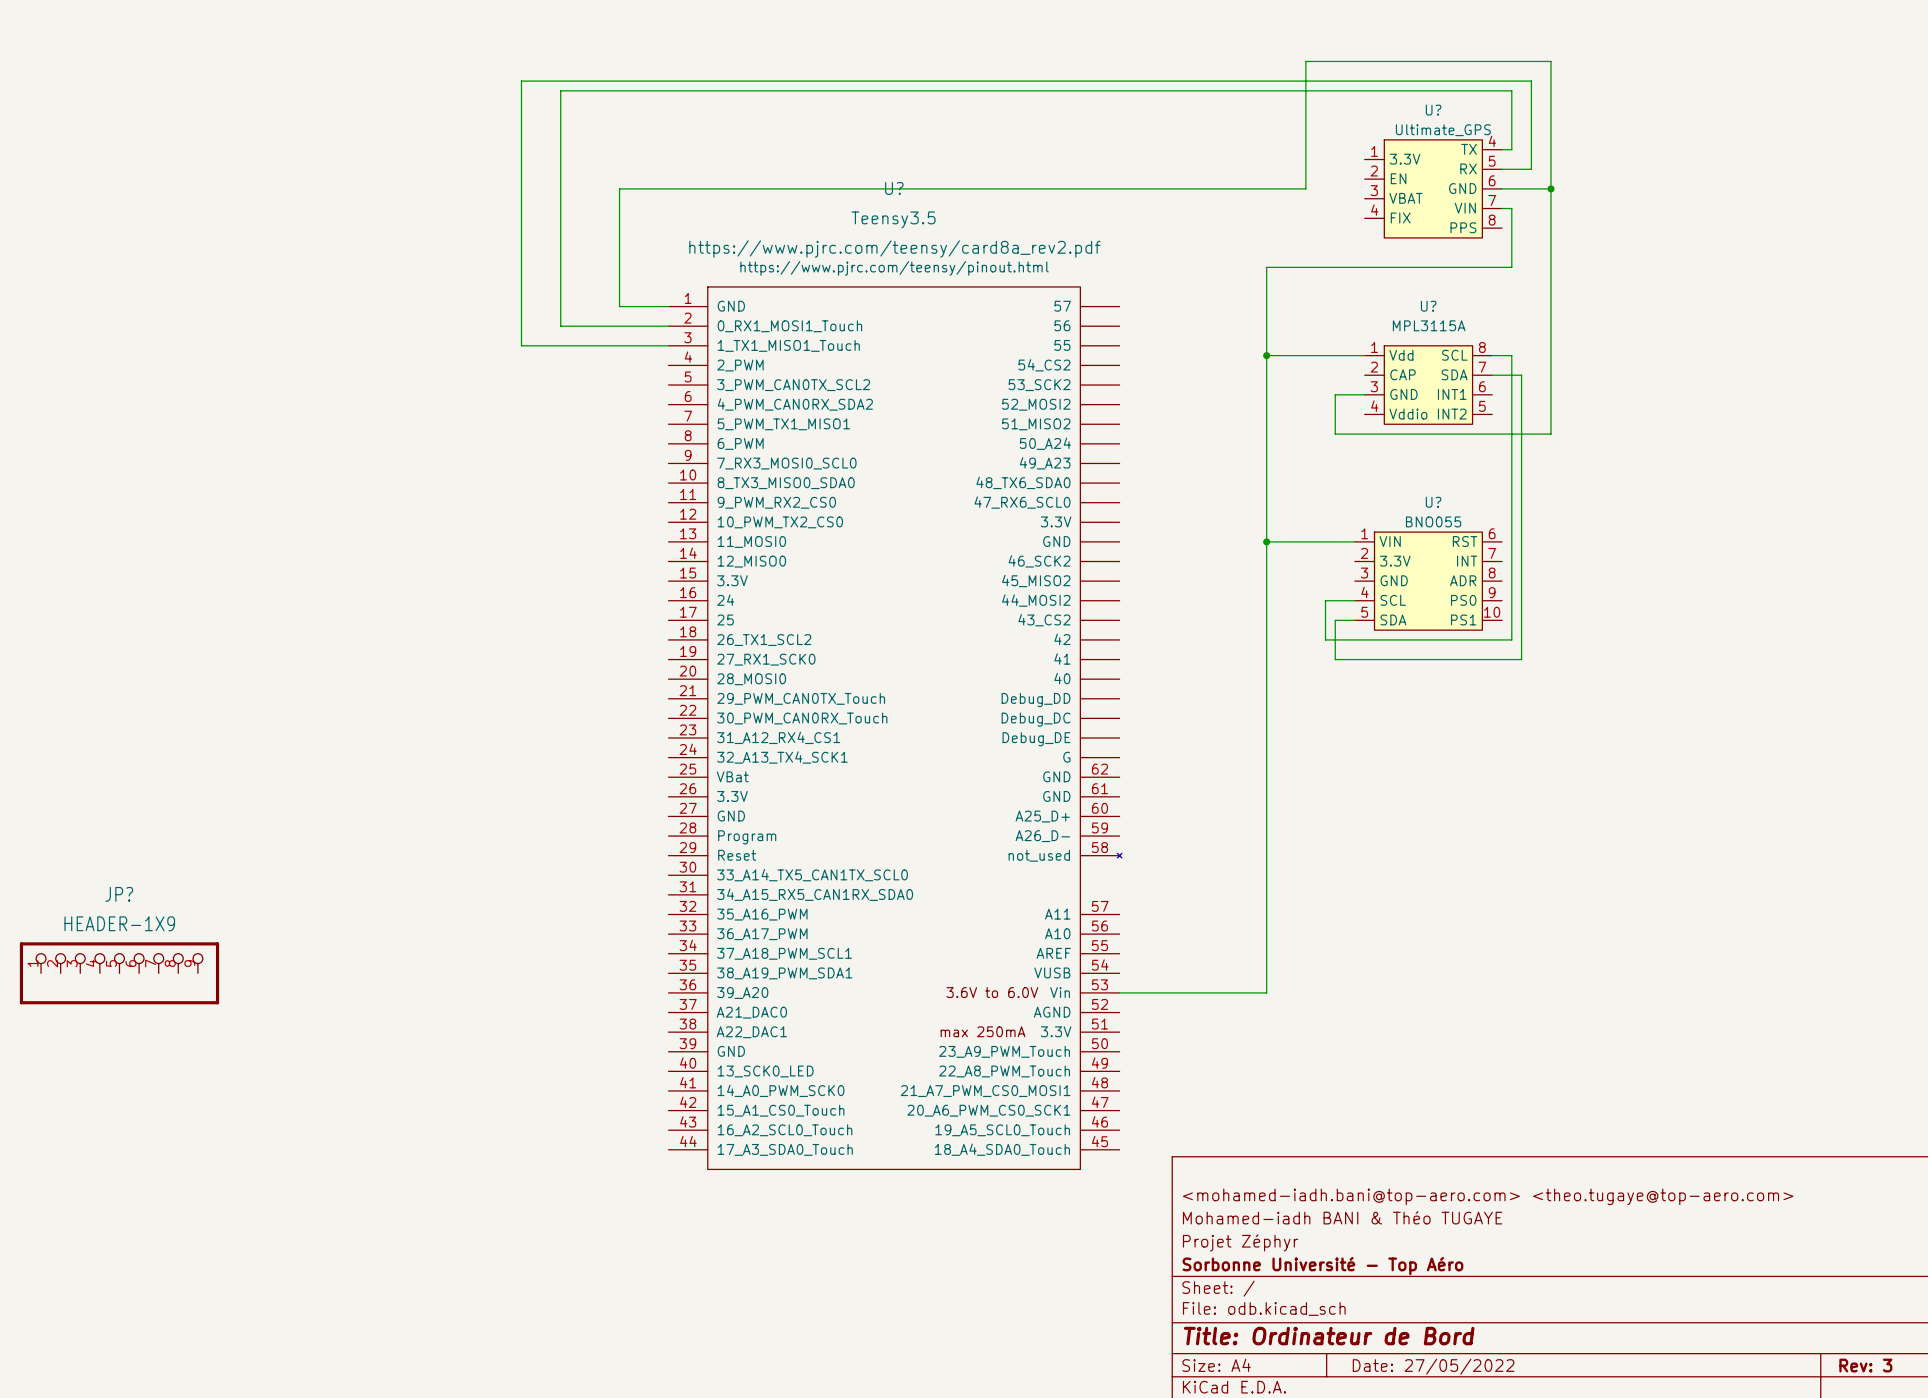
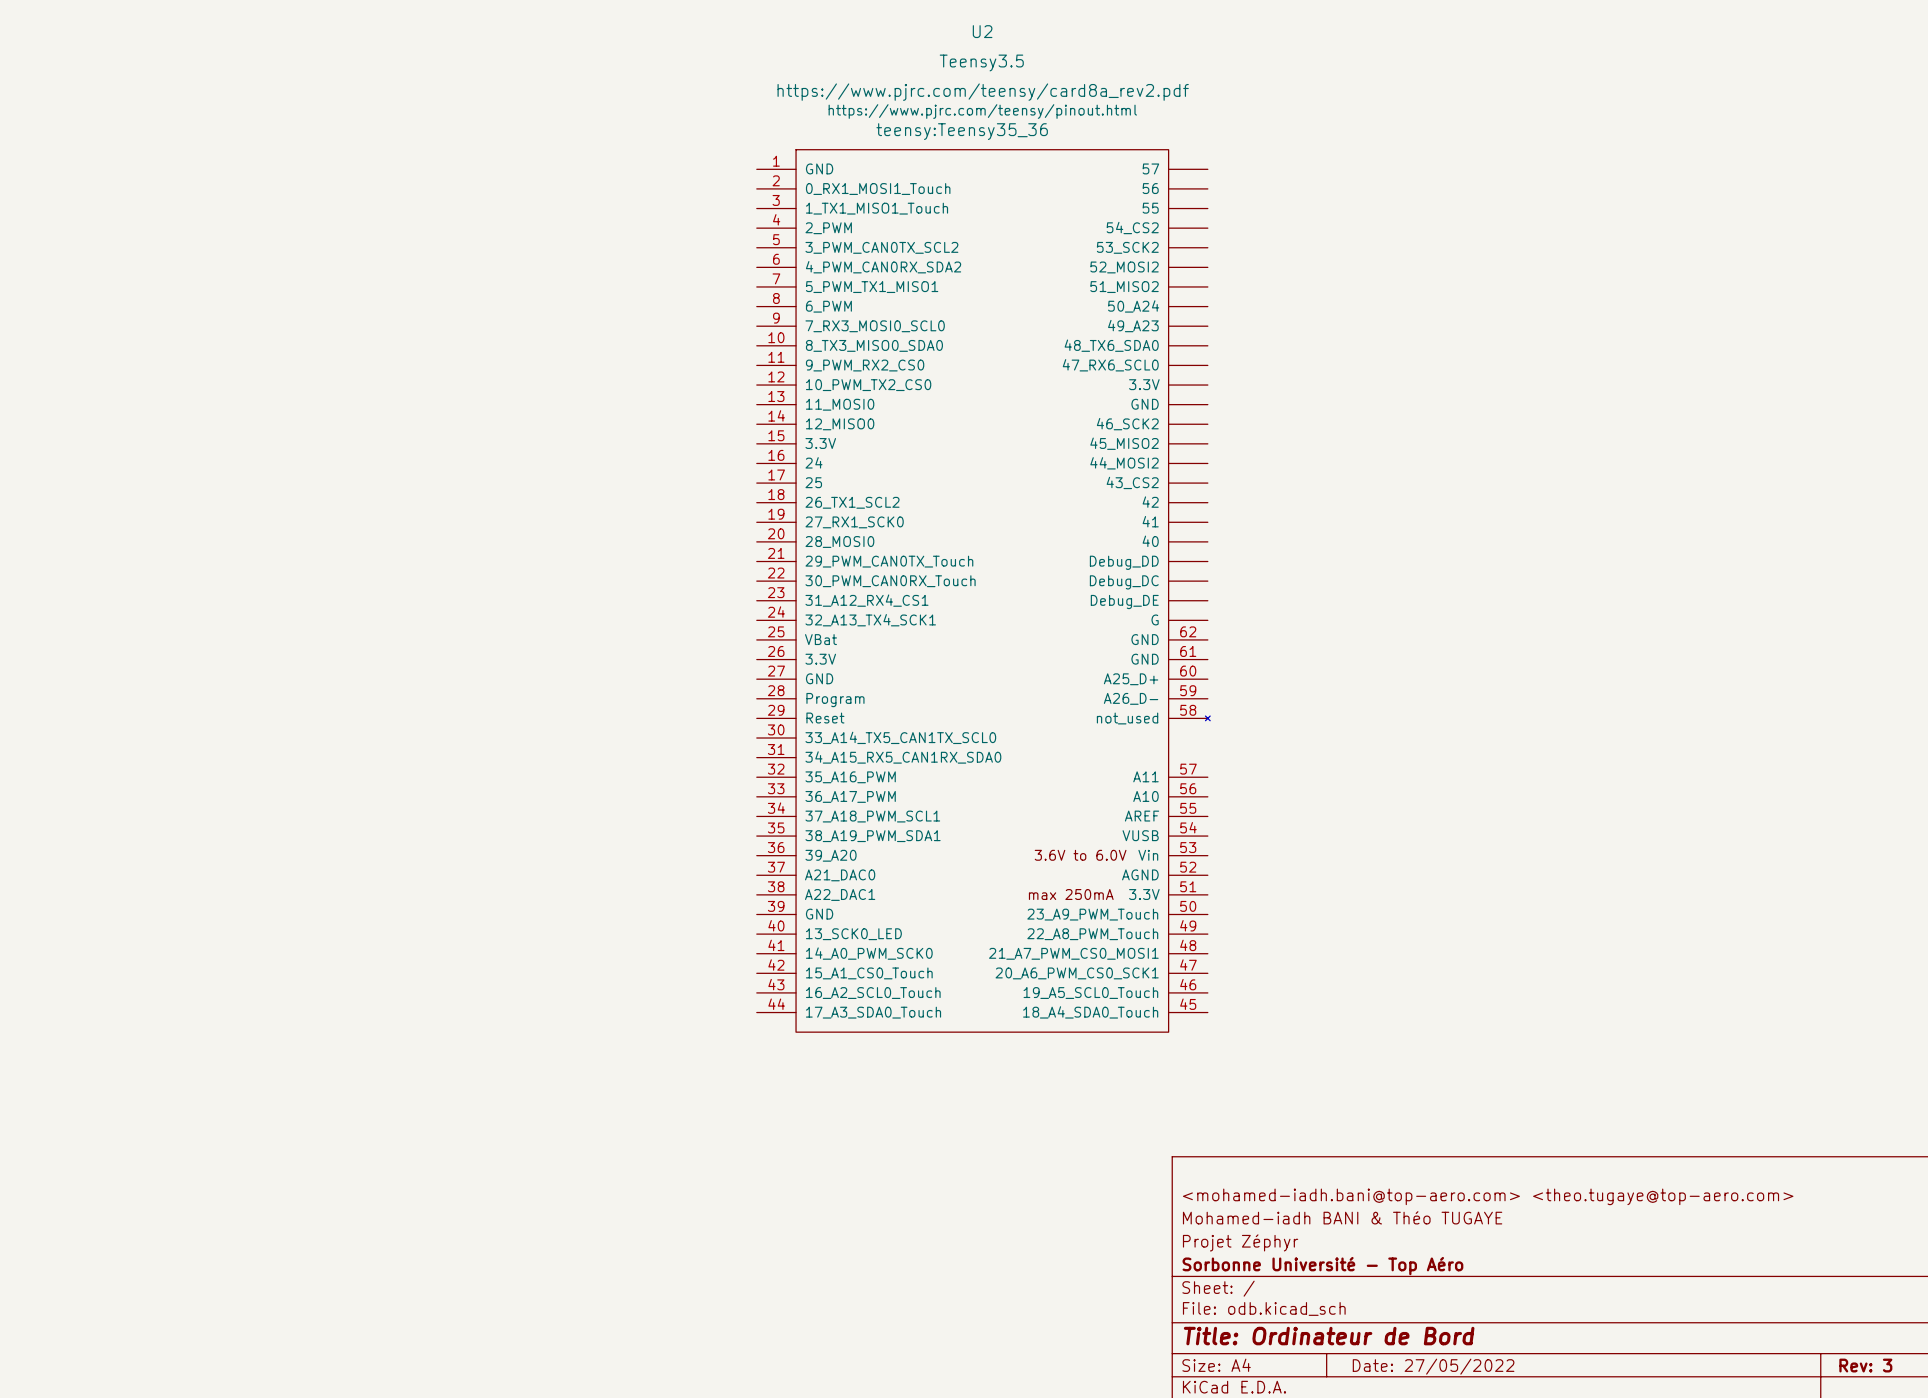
wire: (1501, 149) (1511, 149) (1511, 90) (560, 90) (560, 326) (668, 326) -> none
U?: Ultimate_GPS (1452, 169) -> none
wire: (1501, 169) (1531, 169) (1531, 81) (521, 81) (521, 345) (668, 345) -> none
wire: (1501, 188) (1551, 188) -> none
junction: (1551, 188) -> none
wire: (1501, 208) (1511, 208) (1511, 267) (1266, 267) (1266, 992) (1119, 992) -> none
wire: (668, 306) (619, 306) (619, 188) (1305, 188) (1305, 61) (1551, 61) (1551, 434) (1335, 434) (1335, 394) (1364, 394) -> none
wire: (1266, 355) (1364, 355) -> none
junction: (1266, 355) -> none
wire: (1492, 355) (1511, 355) (1511, 639) (1325, 639) (1325, 600) (1354, 600) -> none
wire: (1492, 375) (1521, 375) (1521, 659) (1335, 659) (1335, 620) (1354, 620) -> none
U?: MPL3115A (1428, 385) -> none
wire: (1266, 541) (1354, 541) -> none
junction: (1266, 541) -> none
U?: BNO055 (1448, 563) -> none
U2: none -> Teensy3.5 (983, 590)
U?: Teensy3.5 (895, 728) -> none
JP?: HEADER-1X9 (119, 973) -> none

